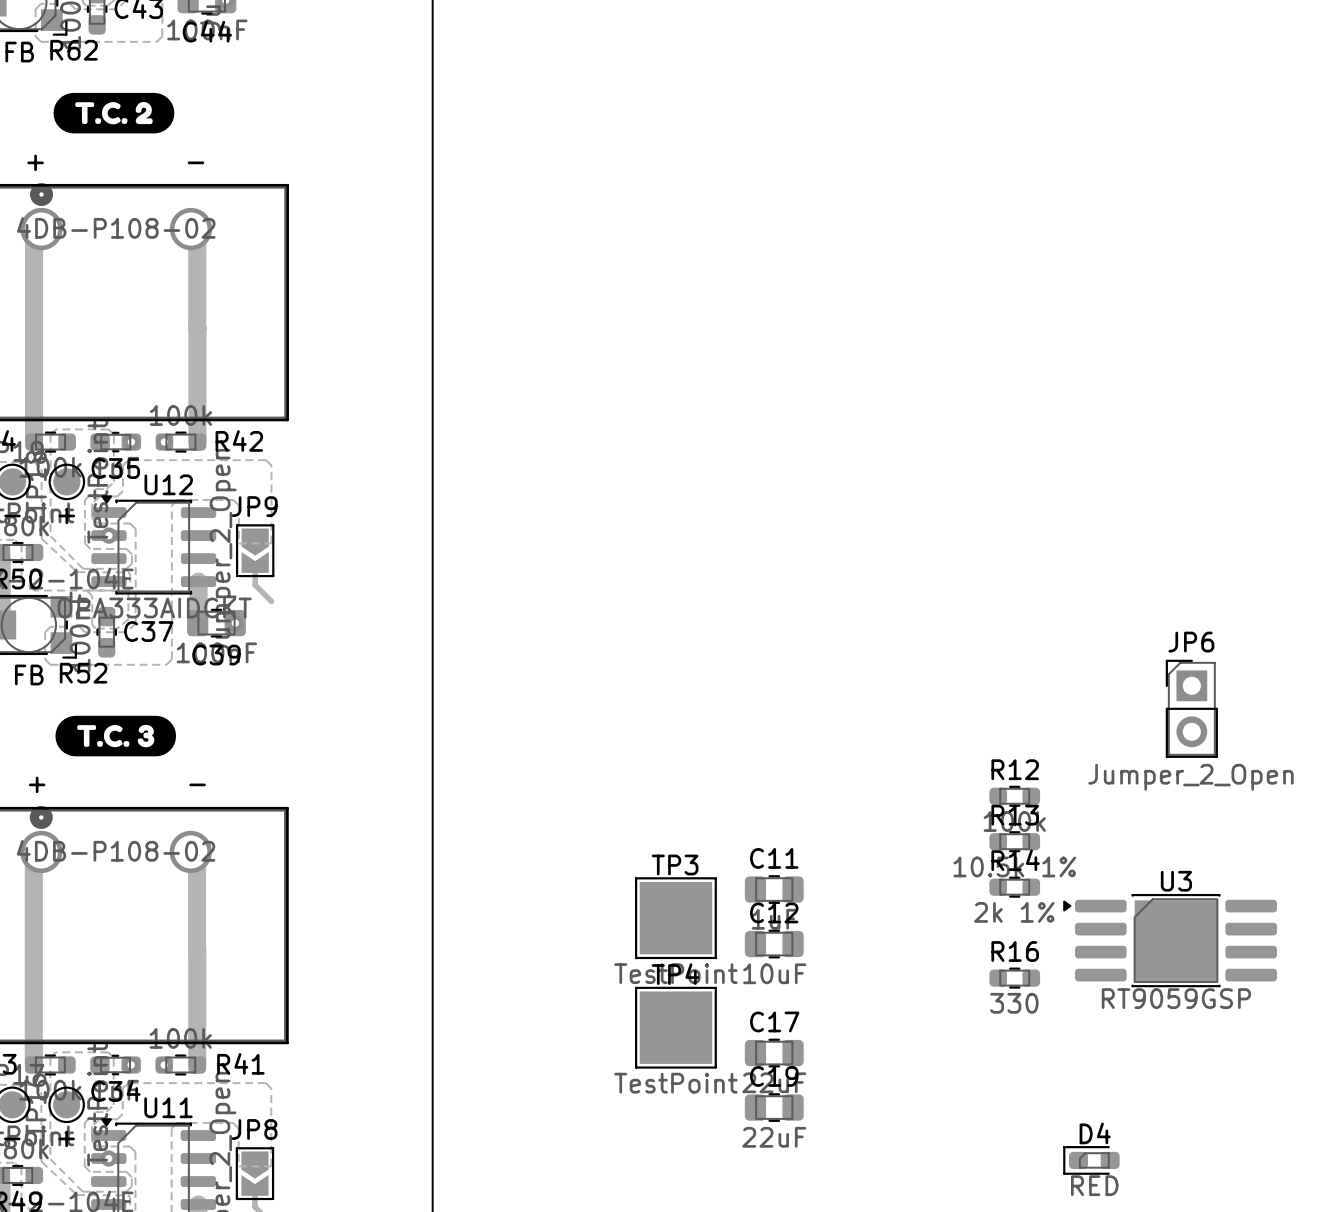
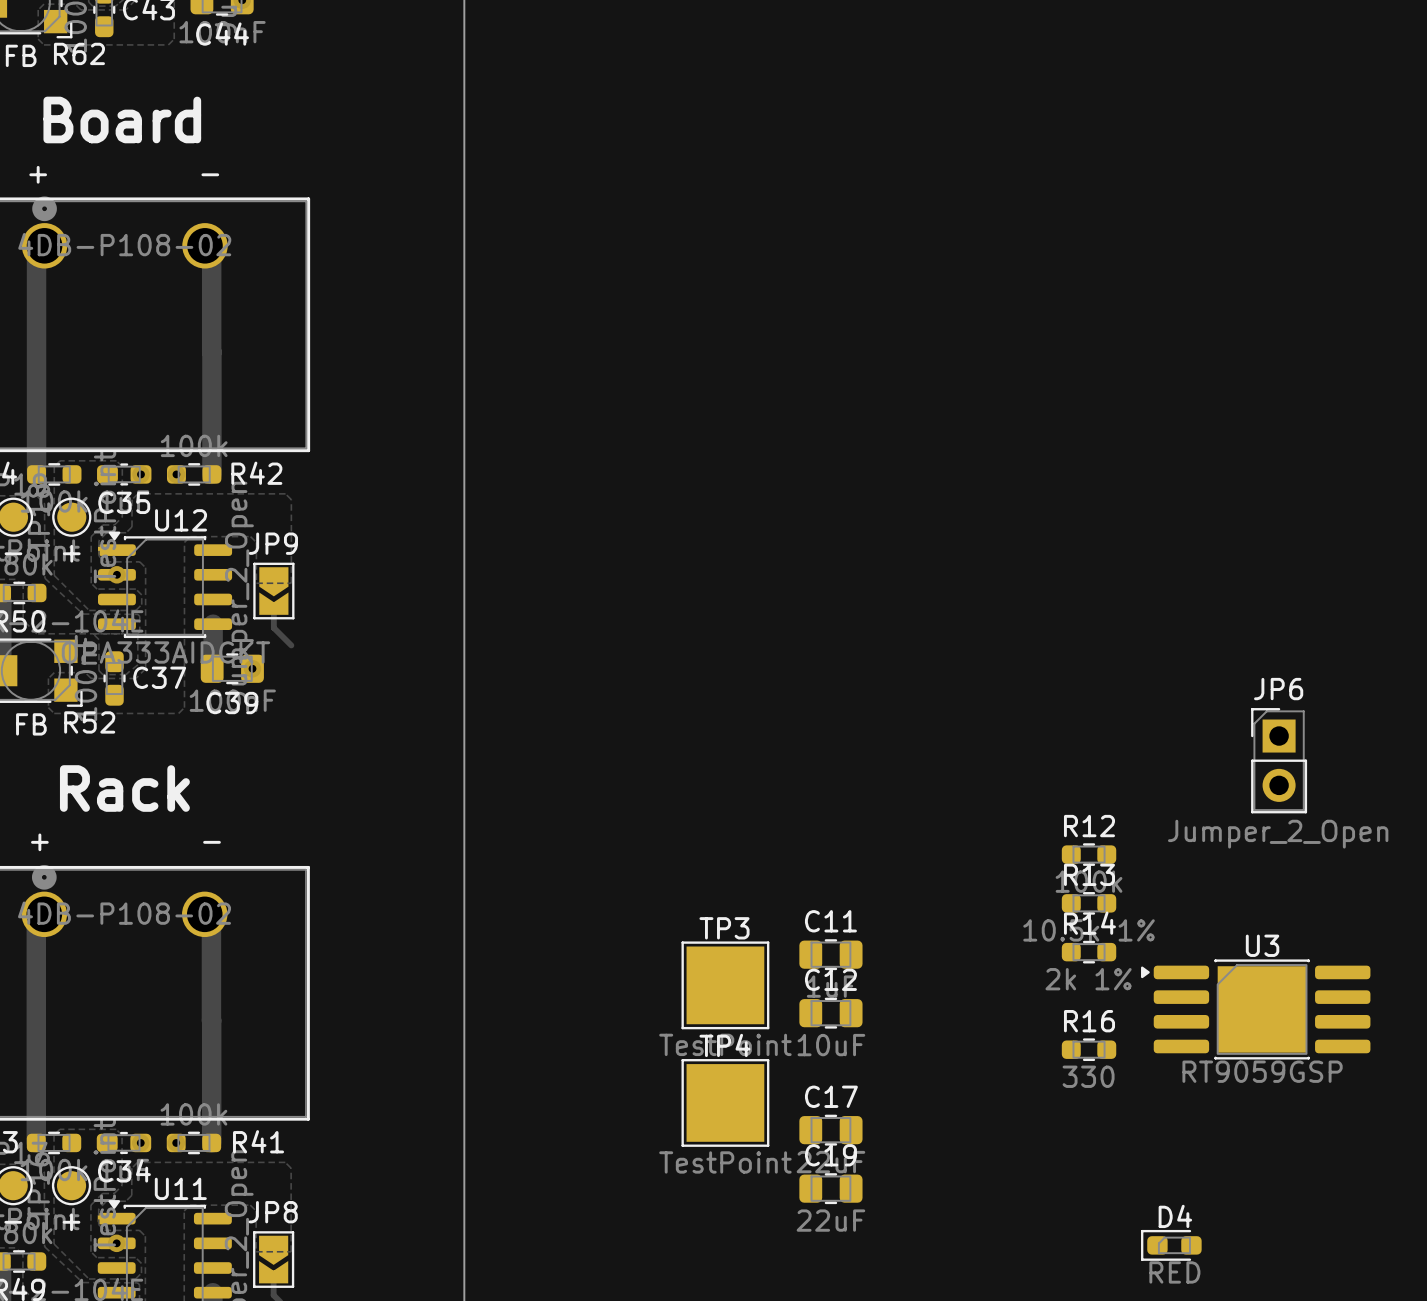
drawing: [53, 92, 175, 134] -> none
text: none -> Board (122, 119)
drawing: [55, 715, 177, 757] -> none
text: none -> Rack (124, 788)

